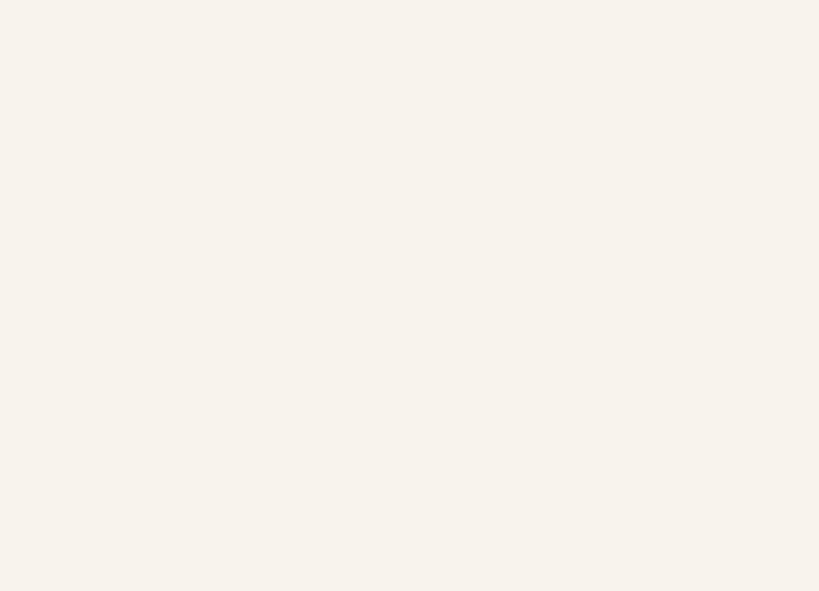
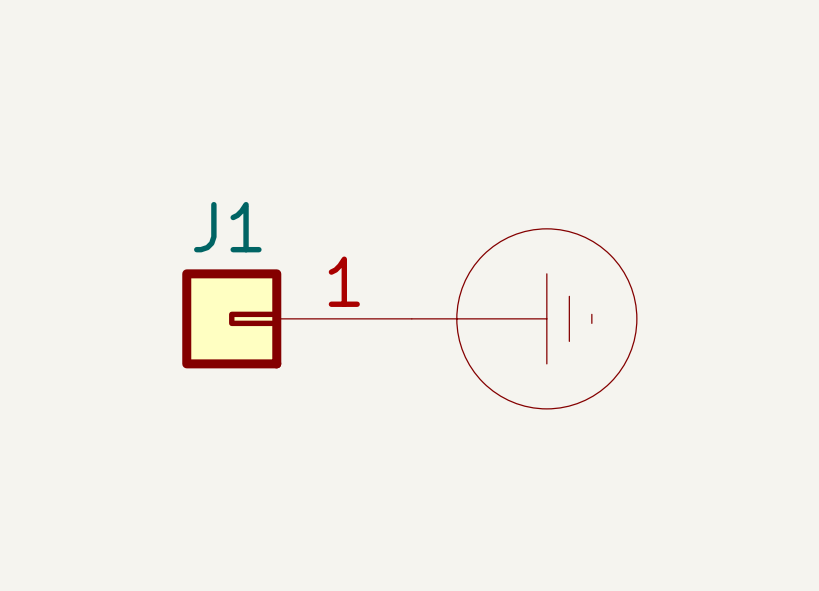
J1: none -> (297, 318)
power symbol: none -> (524, 318)

